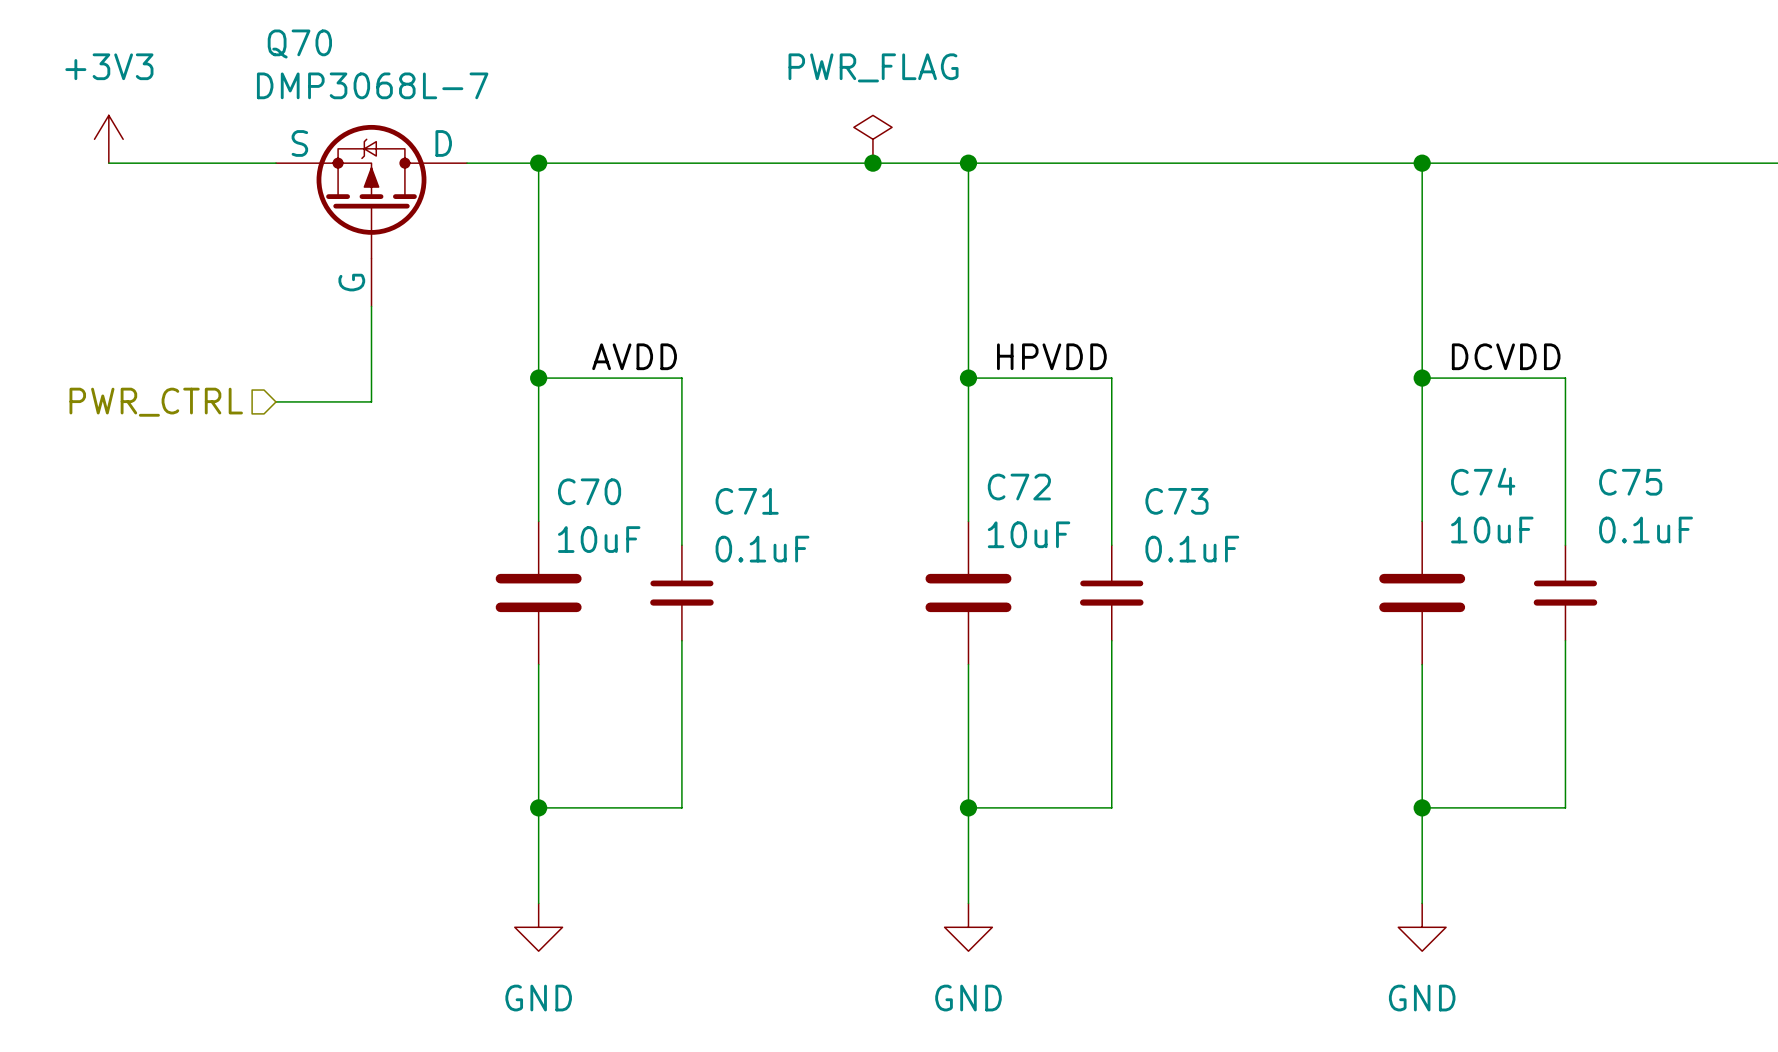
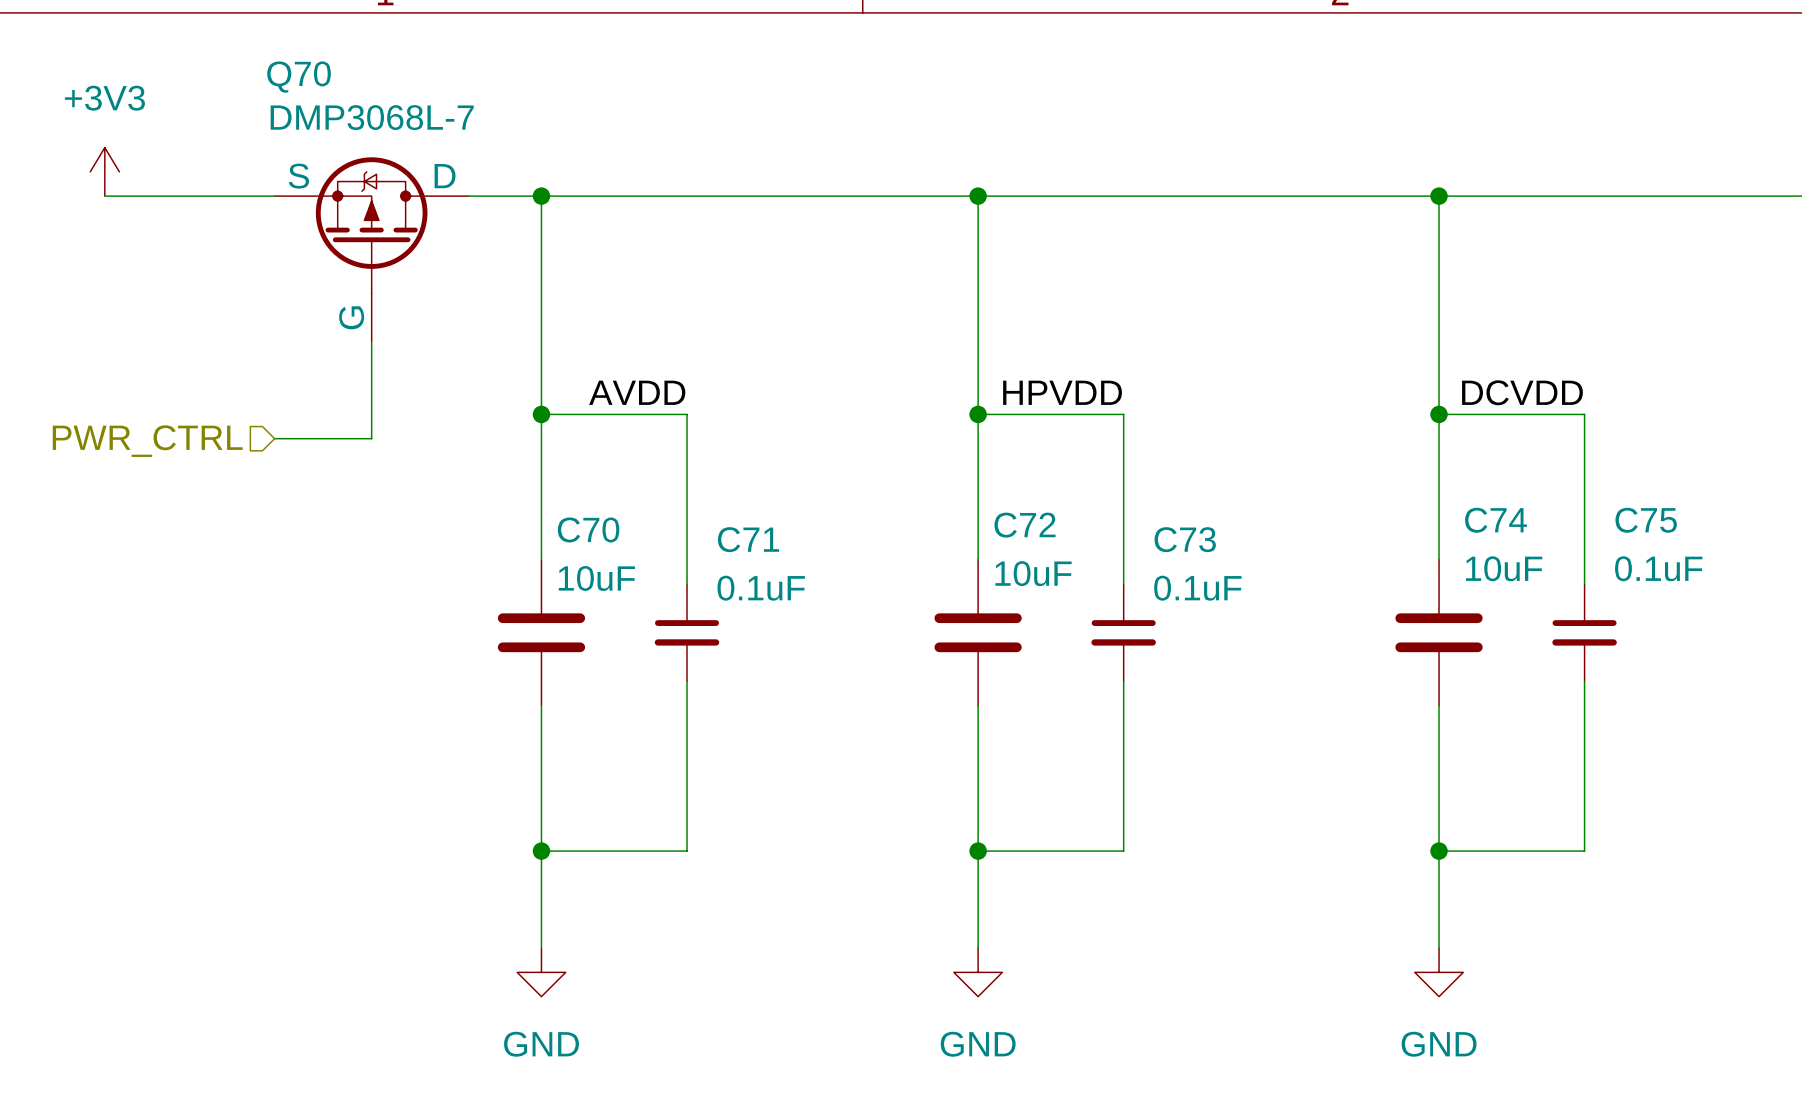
power symbol: PWR_FLAG (872, 139) -> none
junction: (872, 163) -> none

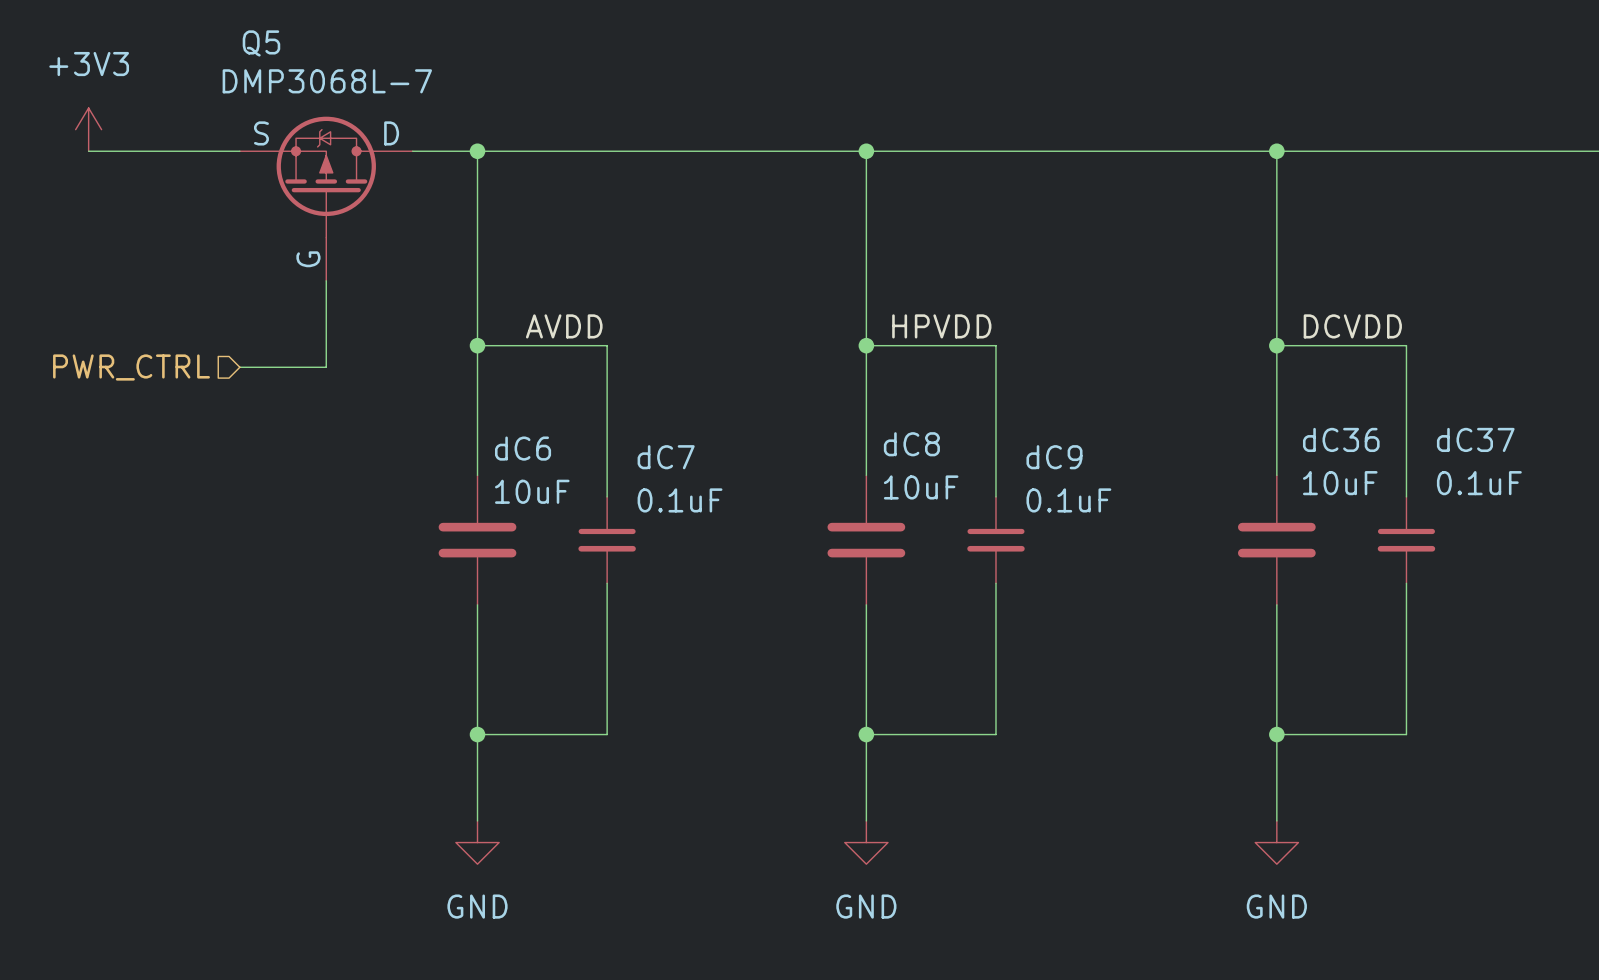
Q70 name: Q70 (299, 77) -> Q5 (261, 43)
C74 name: C74 (1496, 520) -> dC36 (1341, 439)
C75 name: C75 (1646, 520) -> dC37 (1475, 439)
C72 name: C72 (1025, 525) -> dC8 (911, 444)
C70 name: C70 (588, 529) -> dC6 (523, 448)
C71 name: C71 (748, 539) -> dC7 (666, 457)
C73 name: C73 (1185, 539) -> dC9 (1054, 457)

